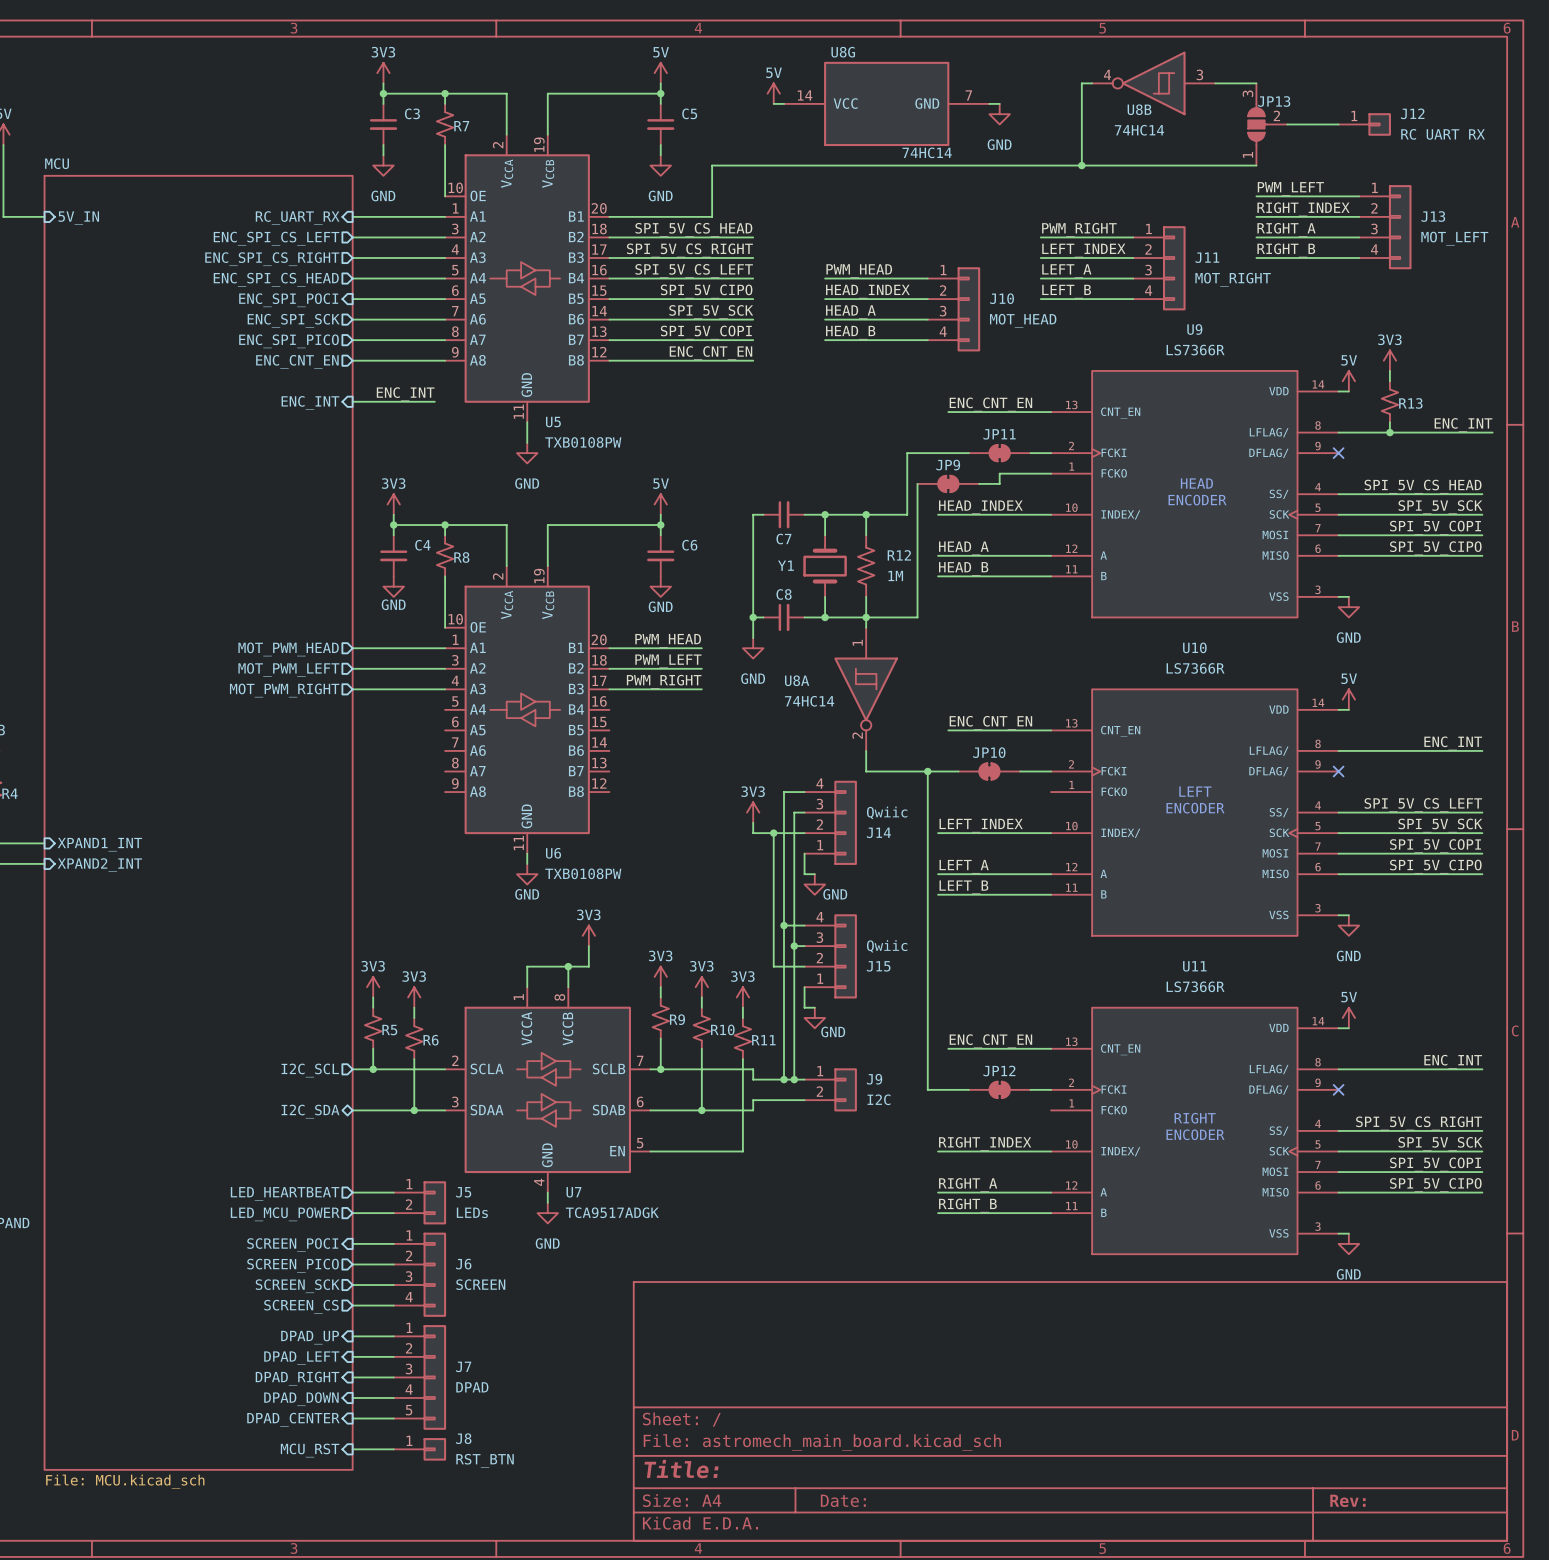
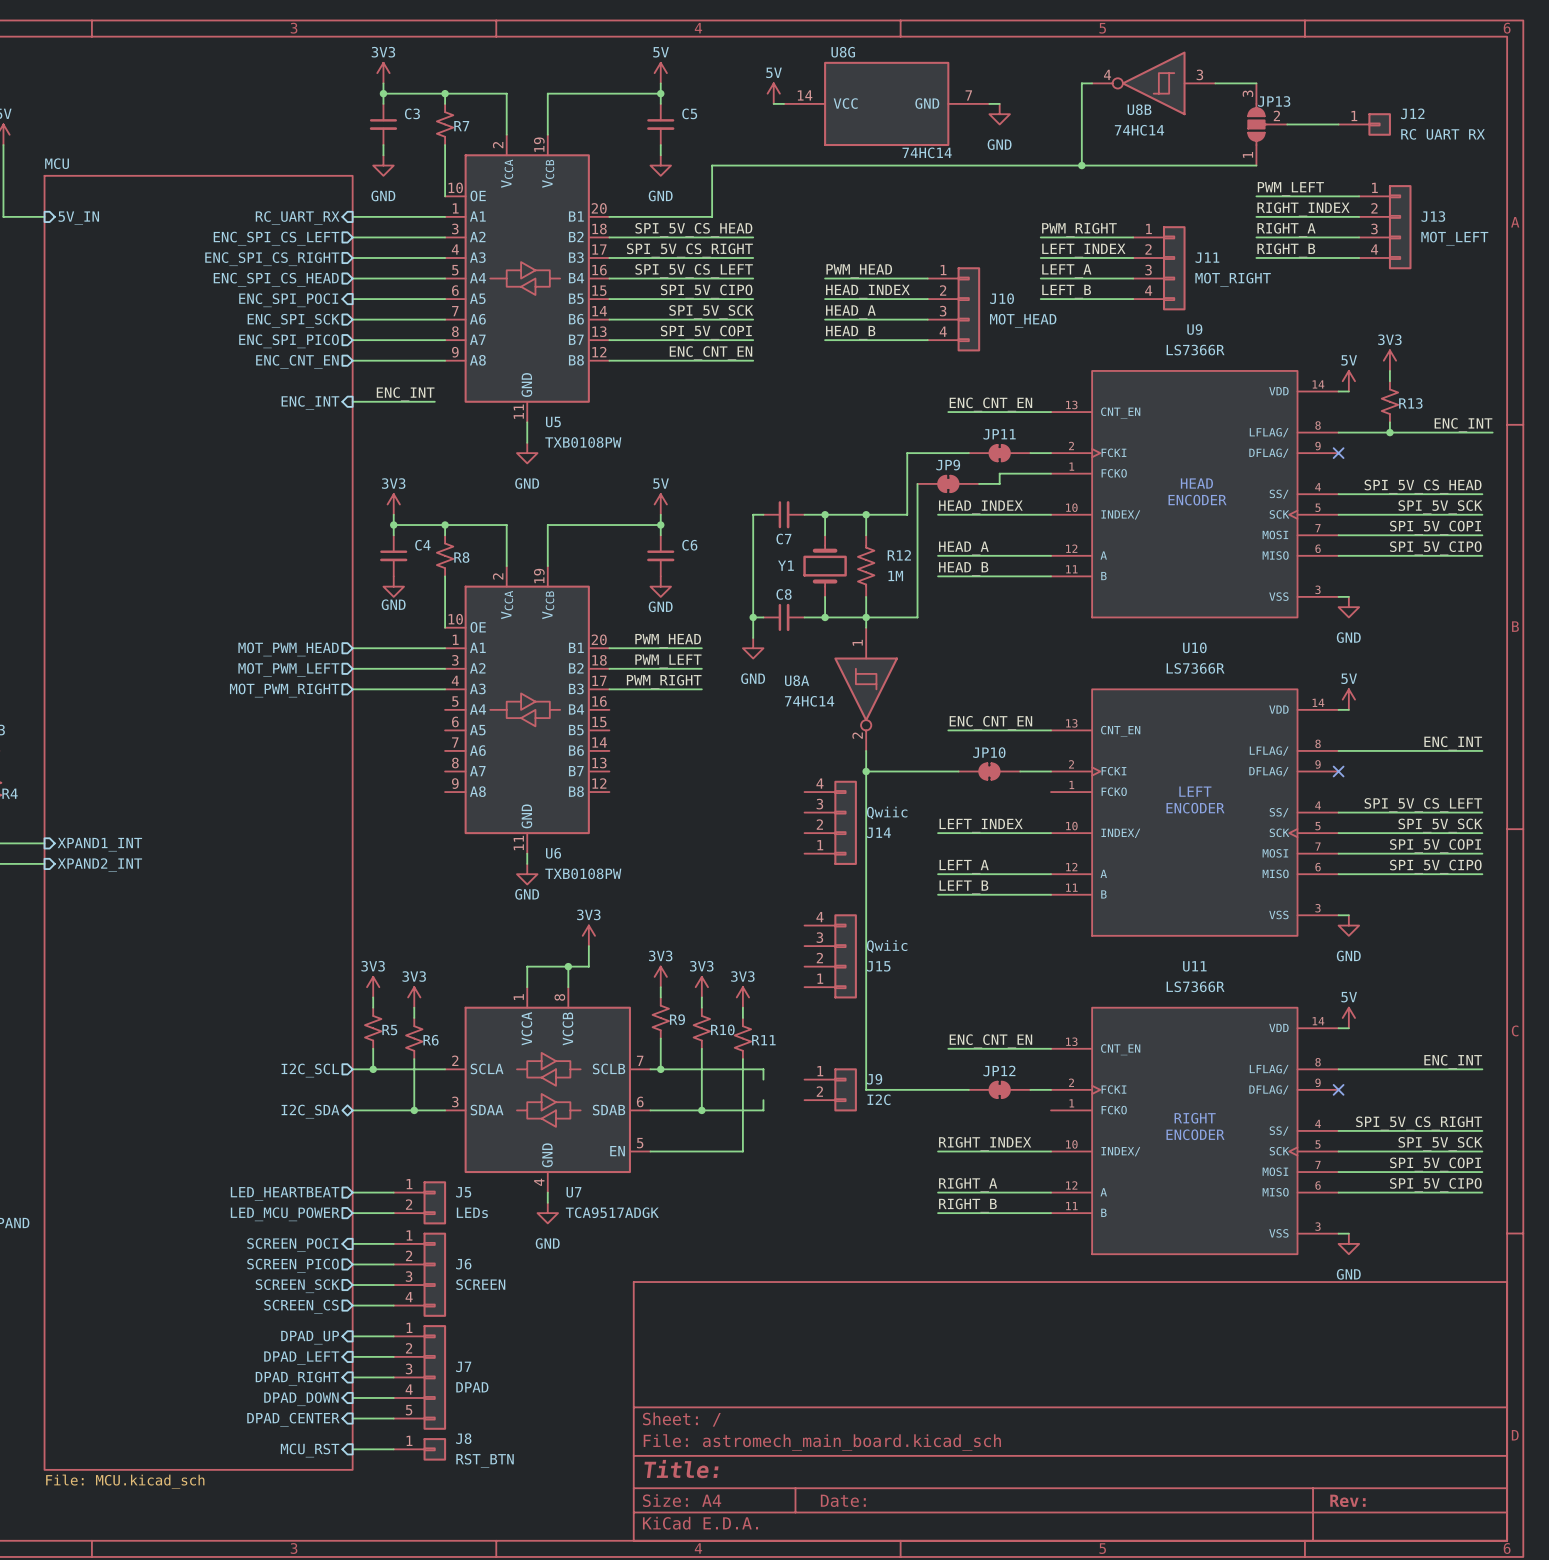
junction: none -> (866, 771)
wire: (927, 771) (927, 1089) -> (866, 771) (866, 1089) (927, 1089)
junction: (927, 771) -> none
wire: (804, 792) (784, 792) (784, 1079) -> none
power symbol: 3V3 (753, 812) -> none
wire: (804, 812) (794, 812) (794, 1079) -> none
wire: (753, 822) (753, 833) (804, 833) -> none
wire: (773, 833) (773, 966) (804, 966) -> none
junction: (773, 833) -> none
wire: (804, 853) (804, 874) (814, 874) -> none
power symbol: GND (814, 884) -> none
wire: (784, 925) (804, 925) -> none
junction: (784, 925) -> none
wire: (794, 946) (804, 946) -> none
junction: (794, 946) -> none
wire: (804, 987) (804, 1007) (814, 1007) -> none
power symbol: GND (814, 1017) -> none
wire: (753, 1069) (753, 1079) (804, 1079) -> (753, 1069) (763, 1069) (763, 1079)
junction: (784, 1079) -> none
junction: (794, 1079) -> none
wire: (804, 1100) (753, 1100) (753, 1110) -> (763, 1100) (763, 1110) (753, 1110)

